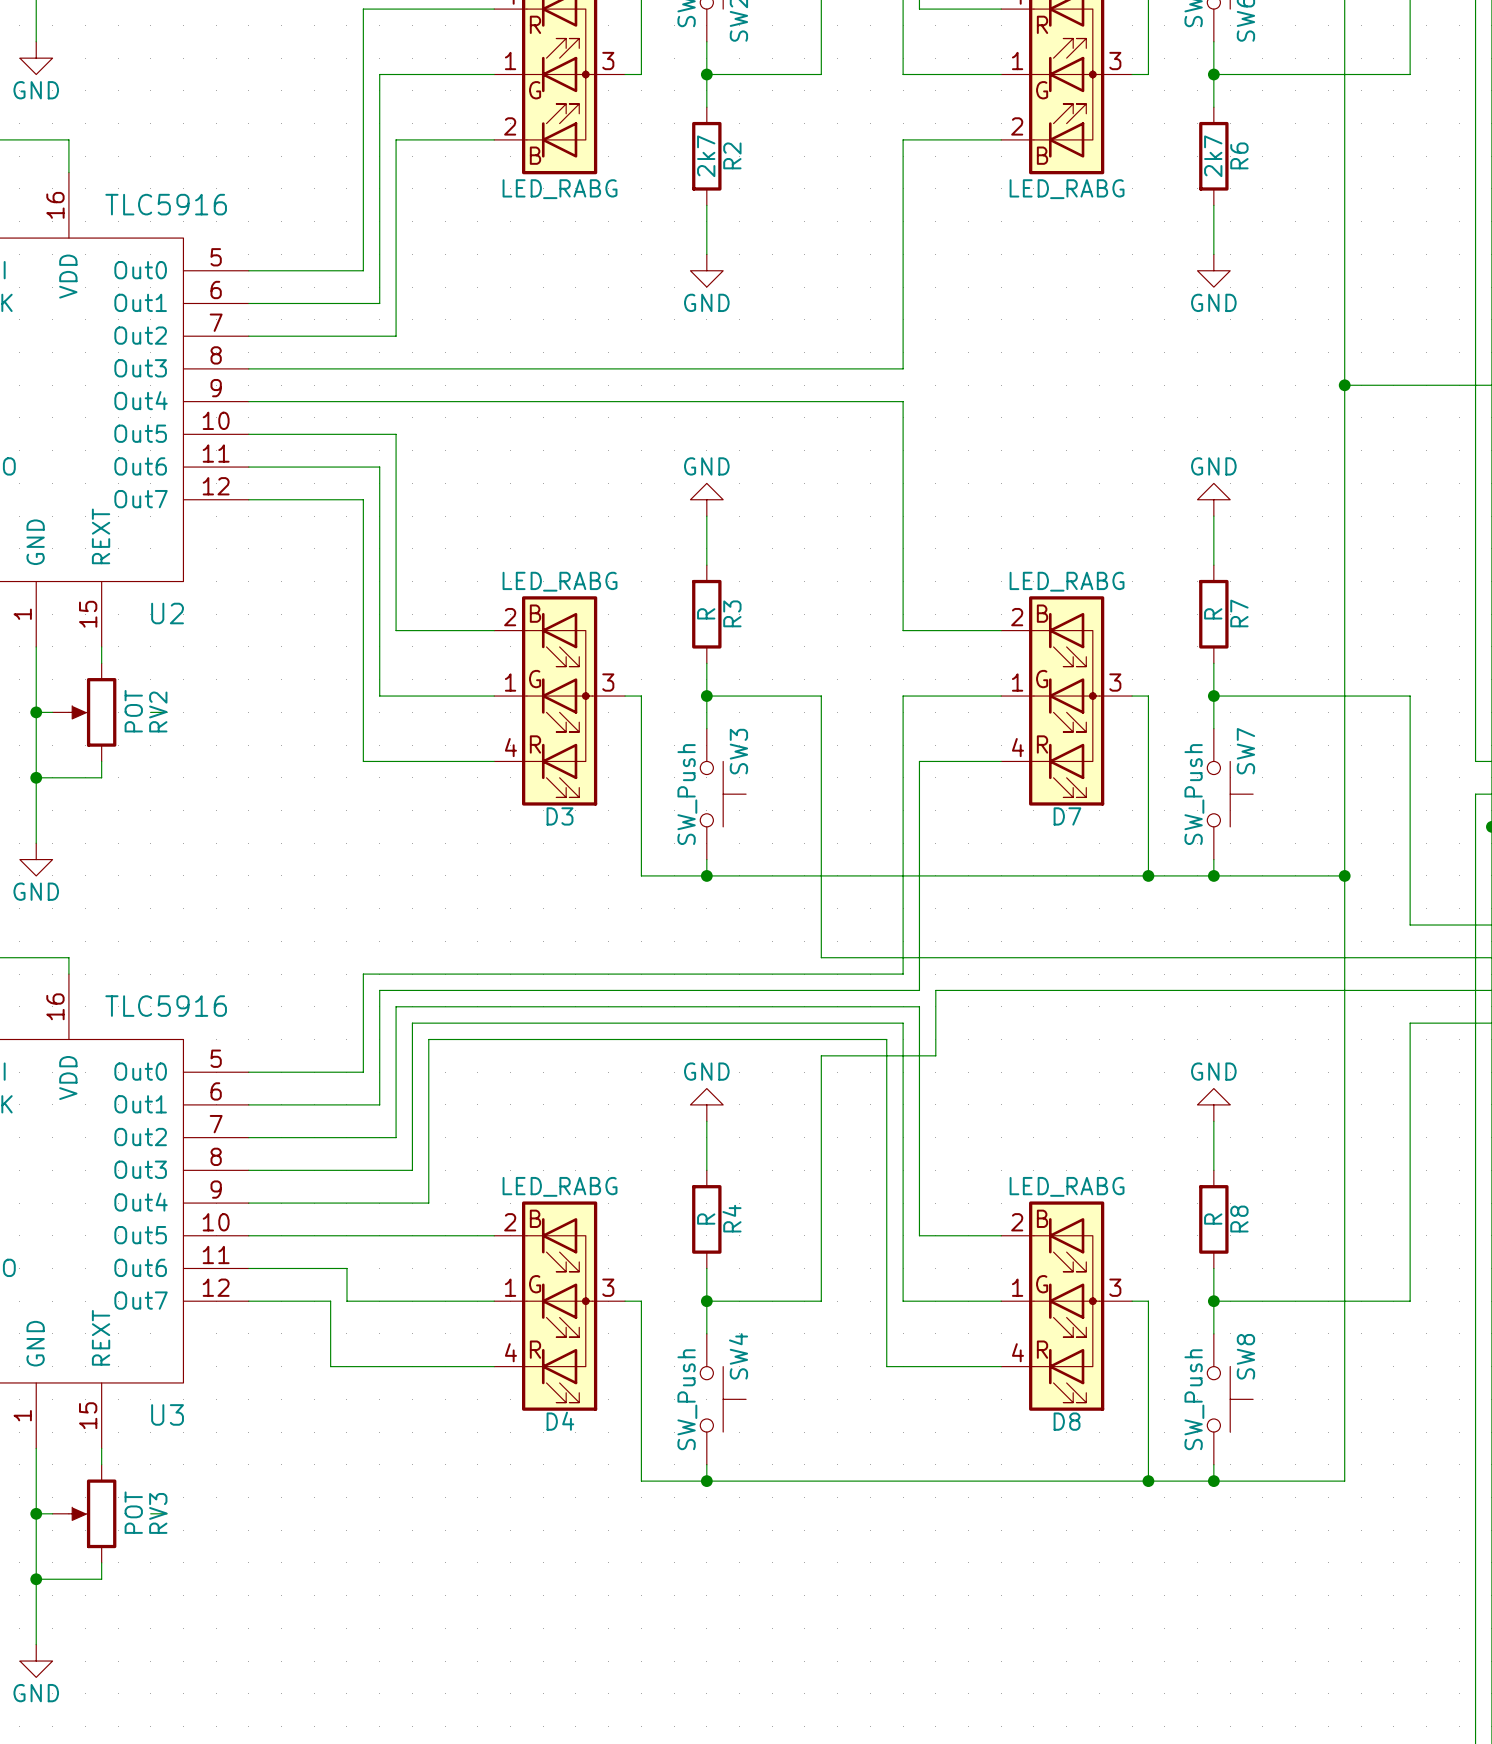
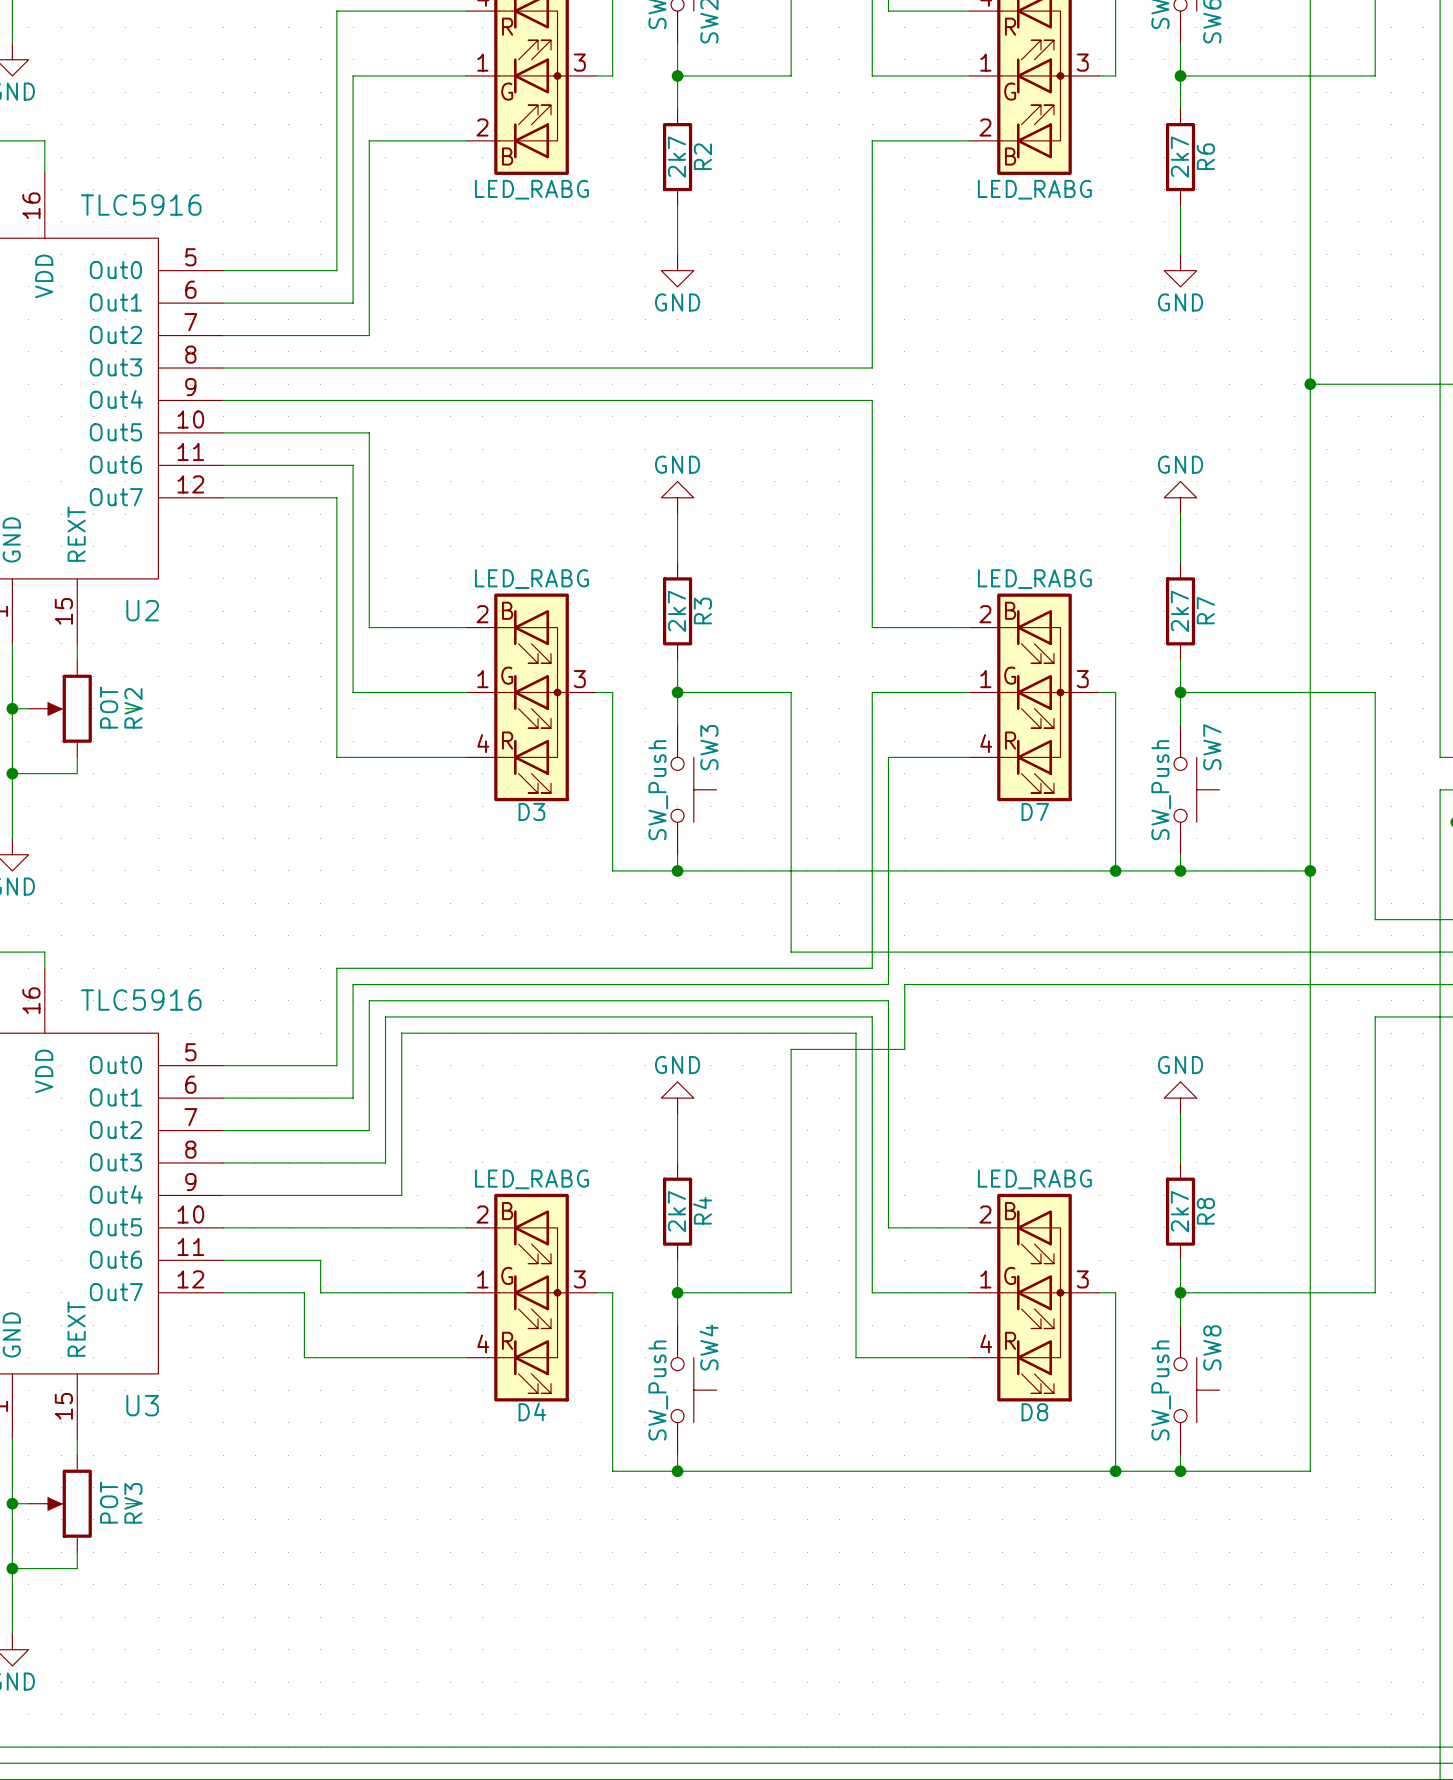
R3 value: R (706, 613) -> 2k7 (676, 611)
R7 value: R (1213, 613) -> 2k7 (1179, 611)
R4 value: R (706, 1219) -> 2k7 (676, 1211)
R8 value: R (1213, 1219) -> 2k7 (1179, 1211)

